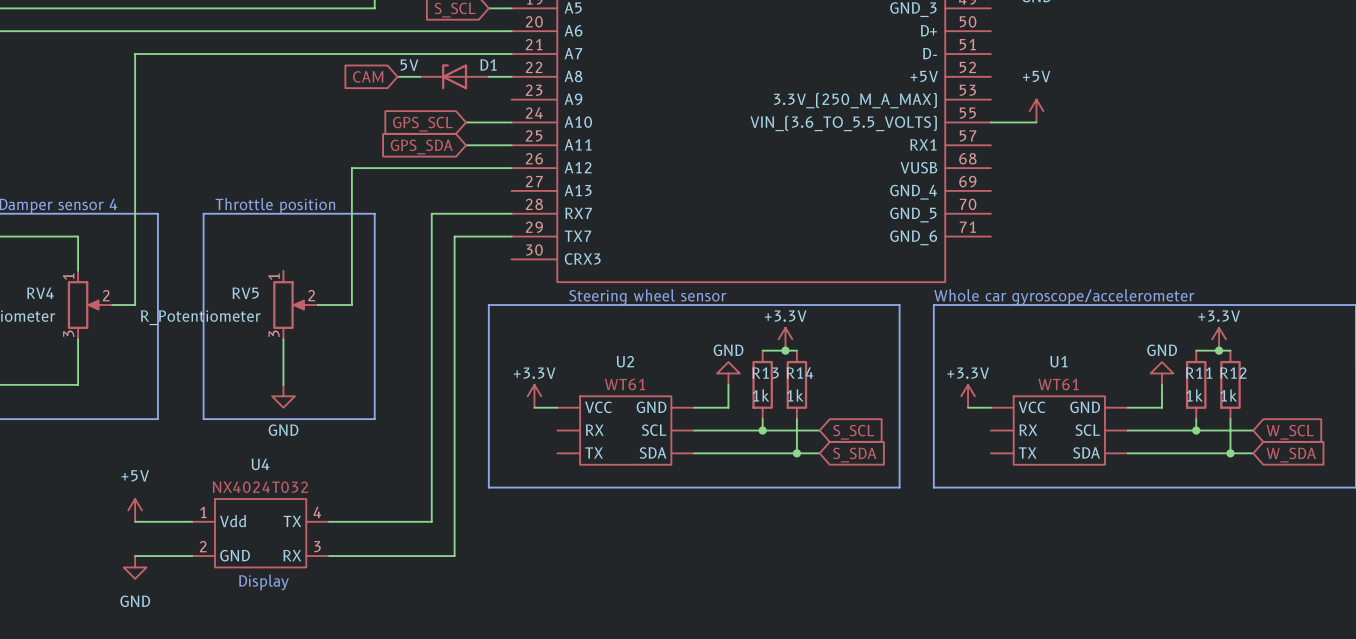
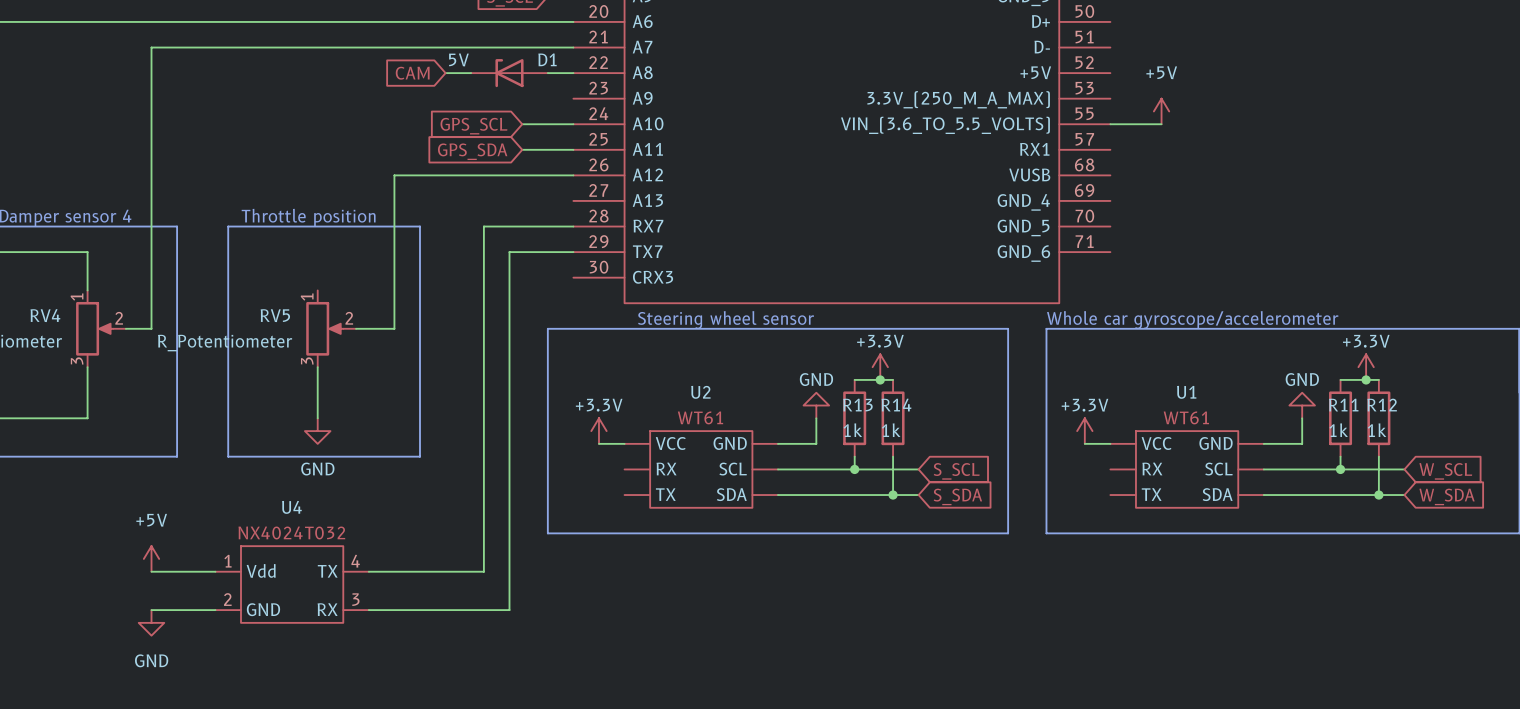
text: Display (263, 582) -> none

